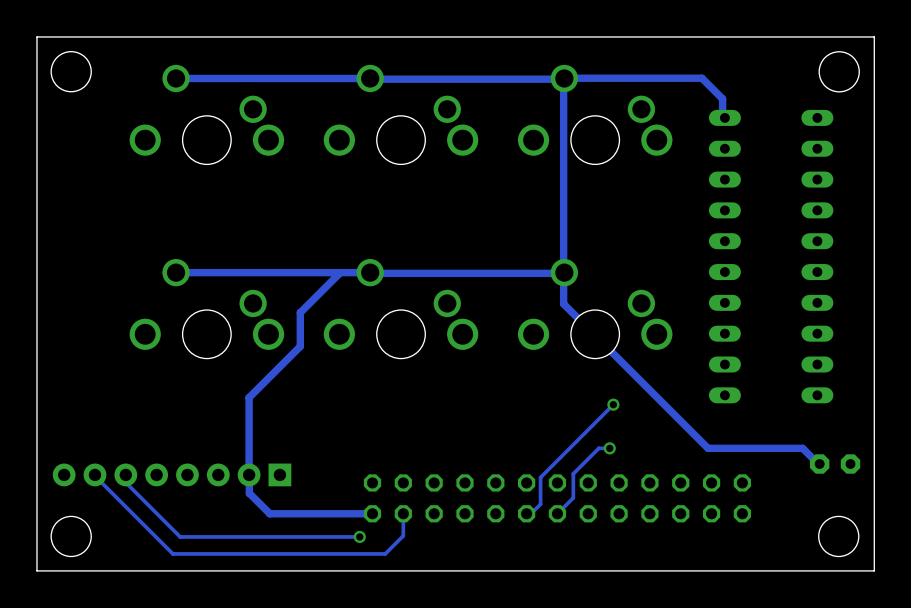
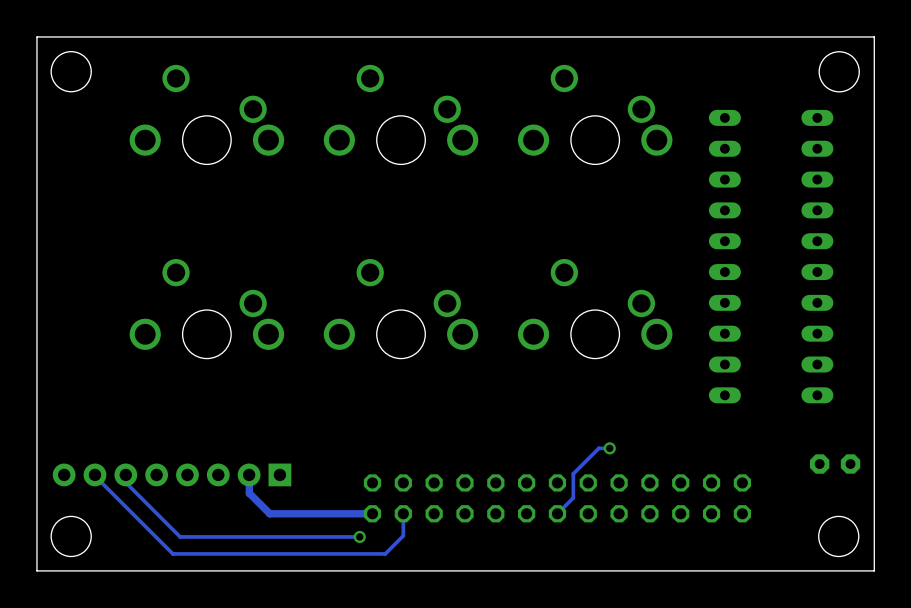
track: (176, 78) (563, 79) -> none
track: (563, 79) (563, 303) (708, 448) (802, 448) (819, 464) -> none
track: (563, 79) (701, 78) (722, 98) (722, 117) (724, 117) -> none
track: (340, 272) (300, 312) (300, 346) (249, 397) (249, 474) -> none
track: (564, 272) (176, 272) -> none
track: (613, 404) (540, 477) (540, 504) (530, 513) (526, 513) -> none
via: (613, 404) -> none

